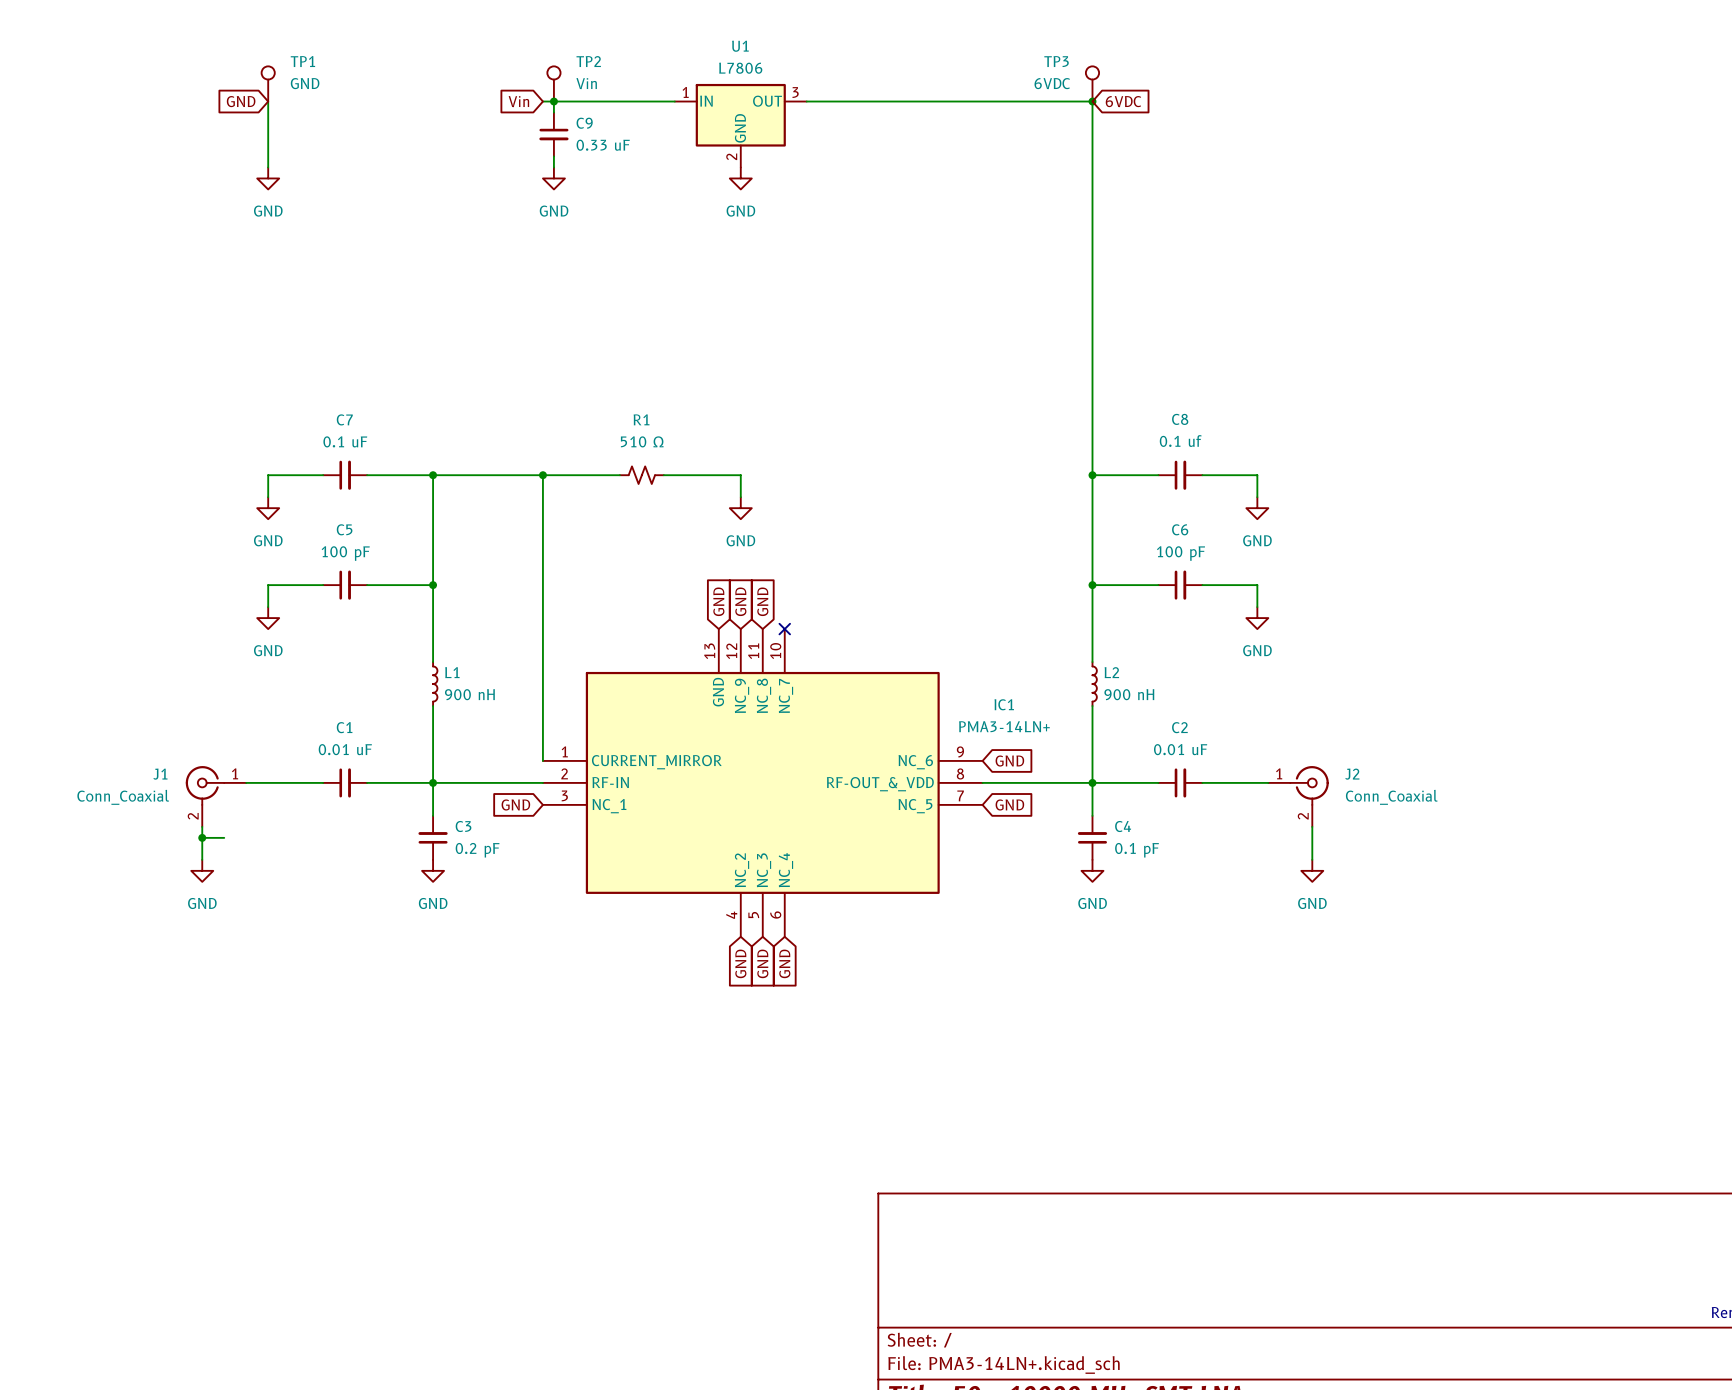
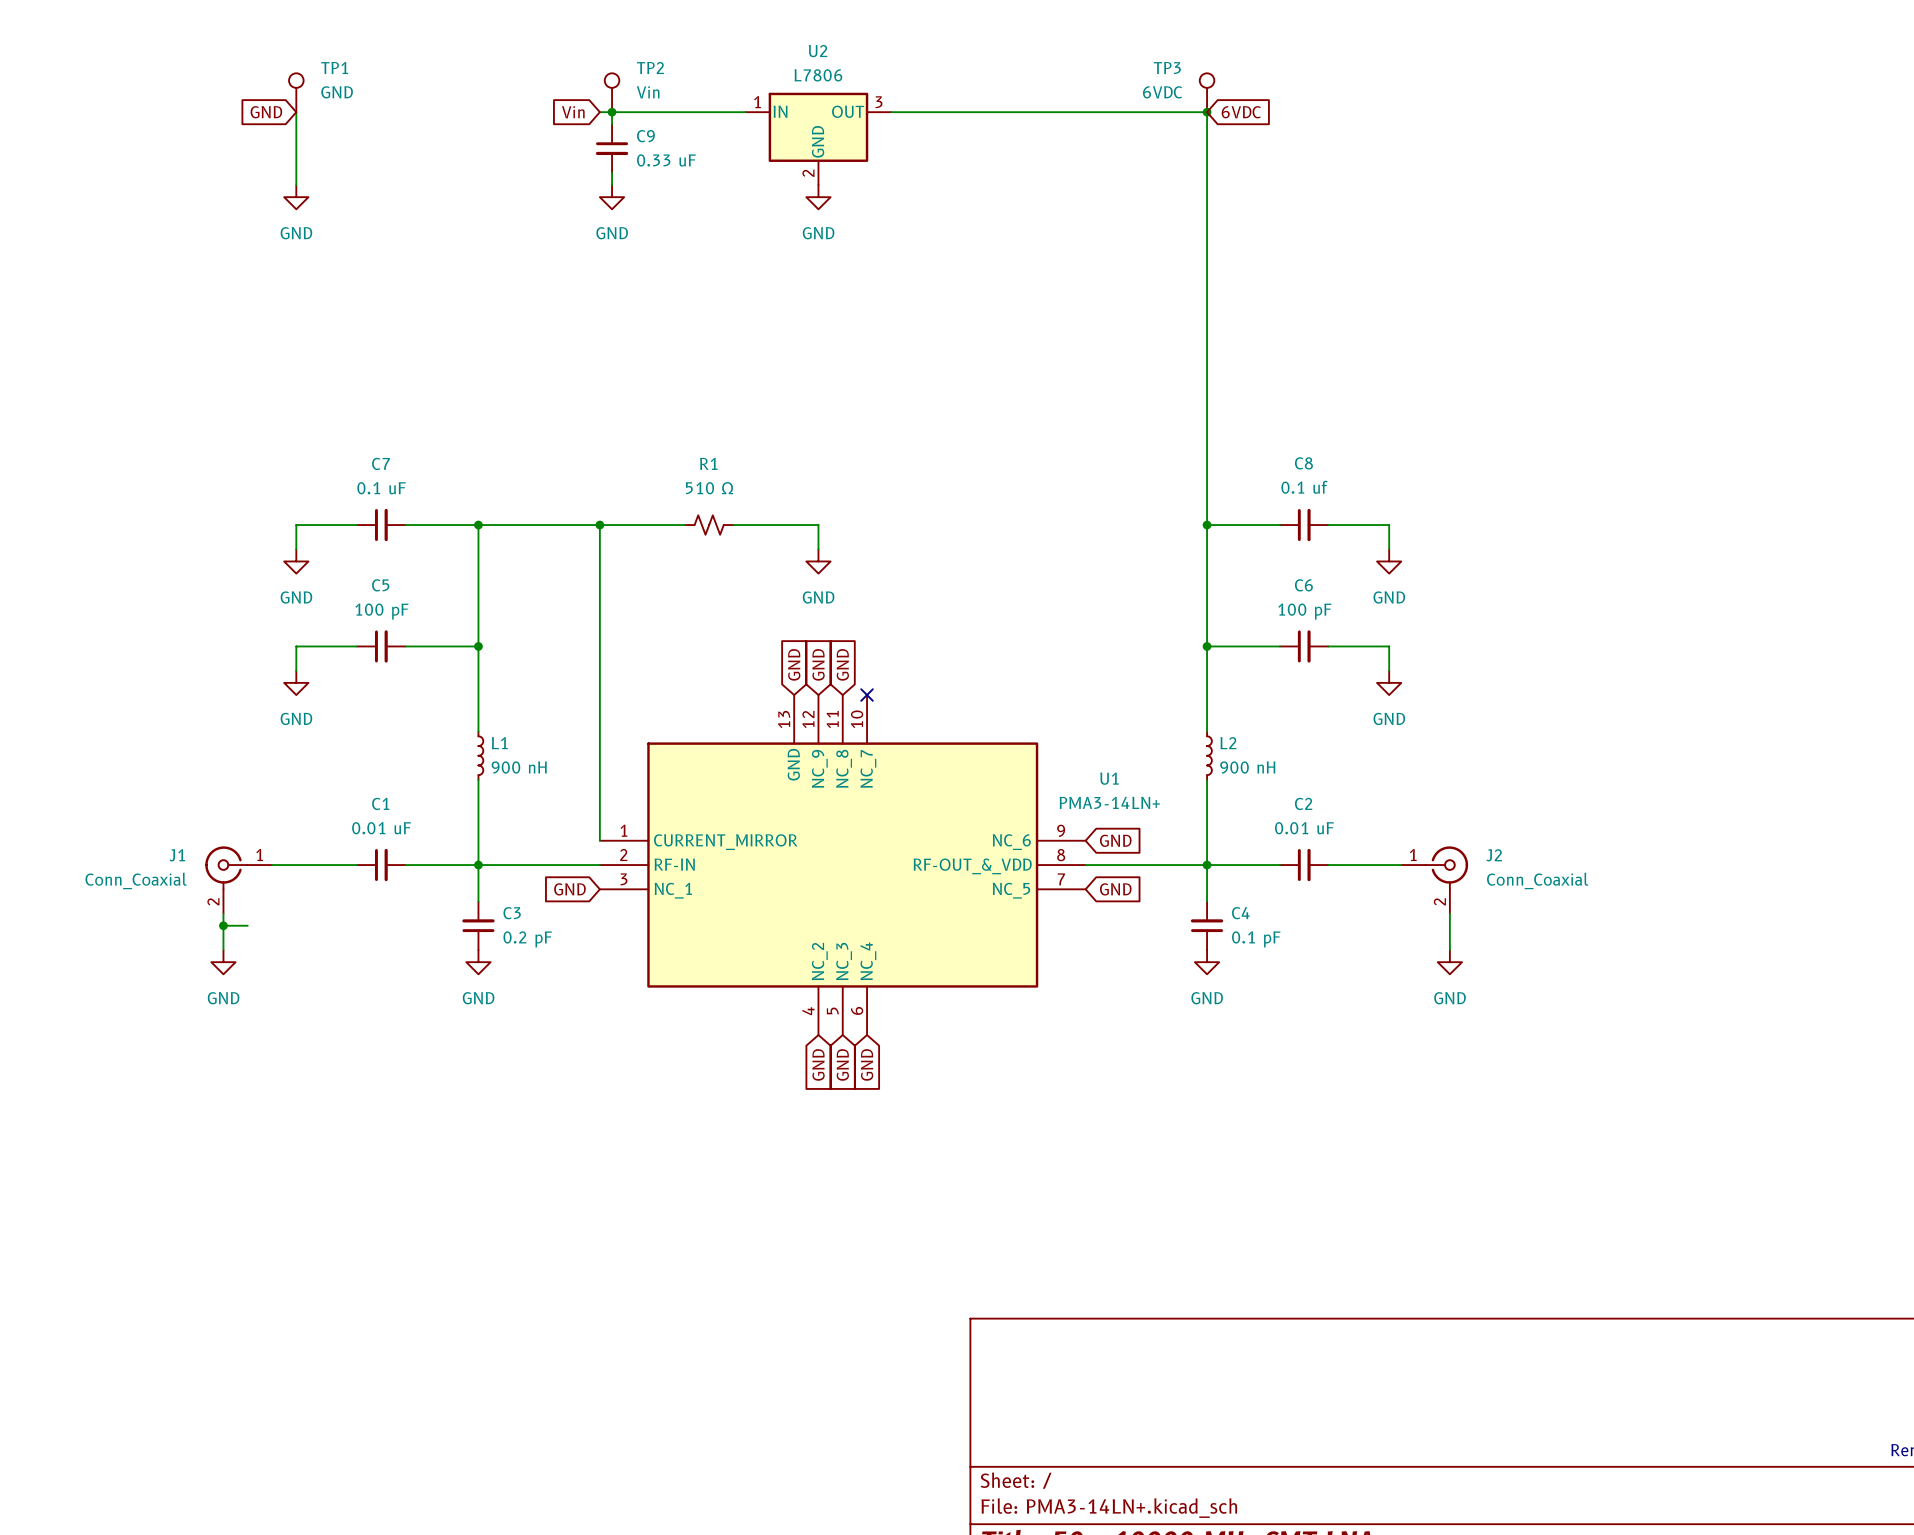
U1 name: U1 (740, 46) -> U2 (818, 51)
IC1 name: IC1 (1004, 704) -> U1 (1109, 778)

